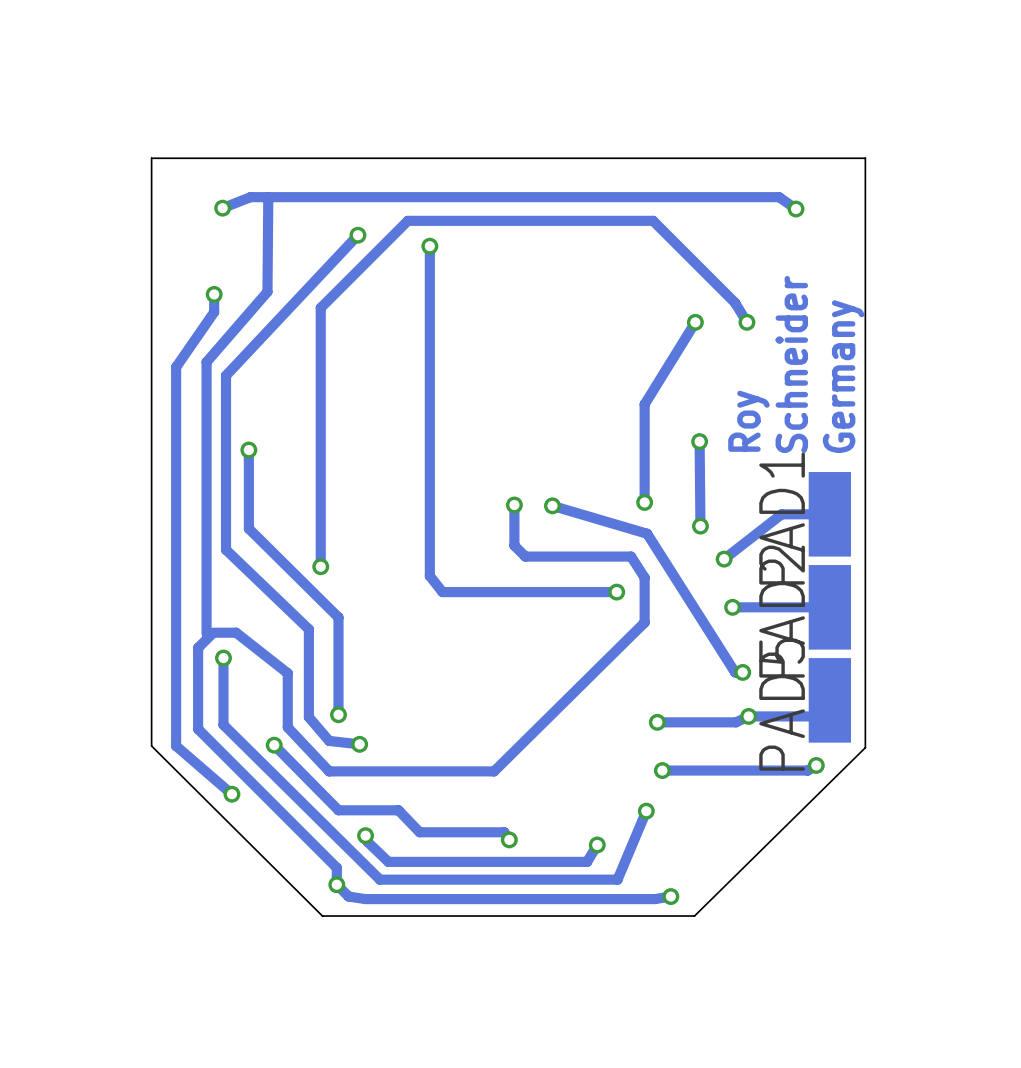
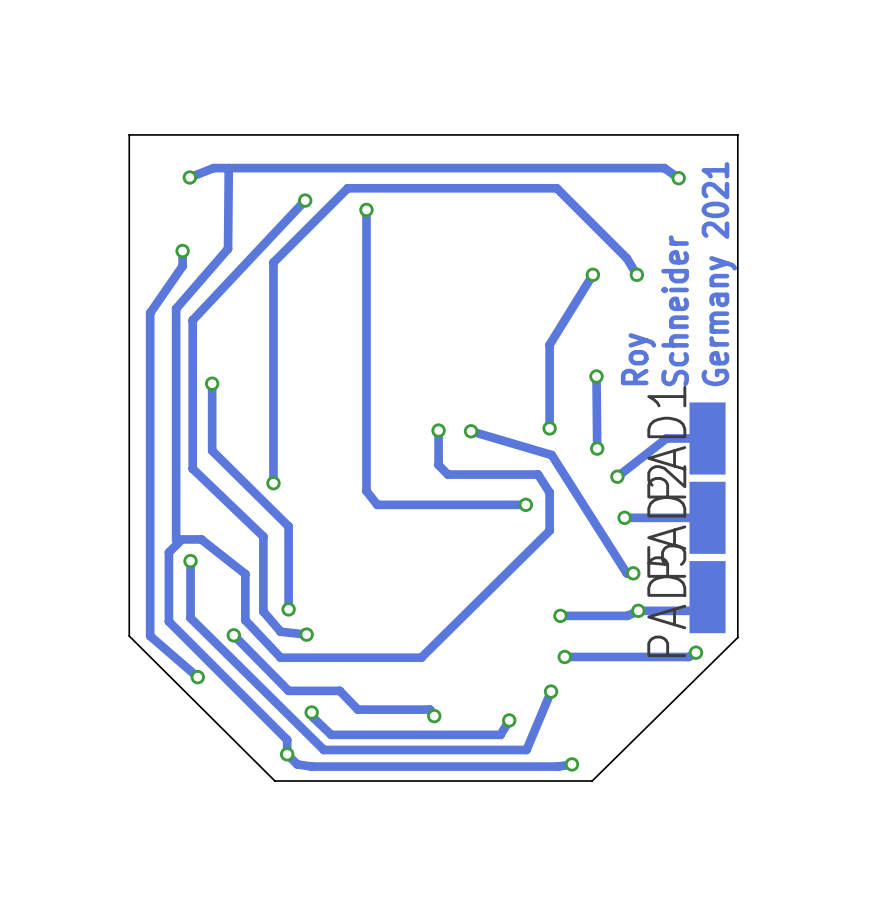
text: Germany (843, 376) -> Germany 2021 (719, 274)

